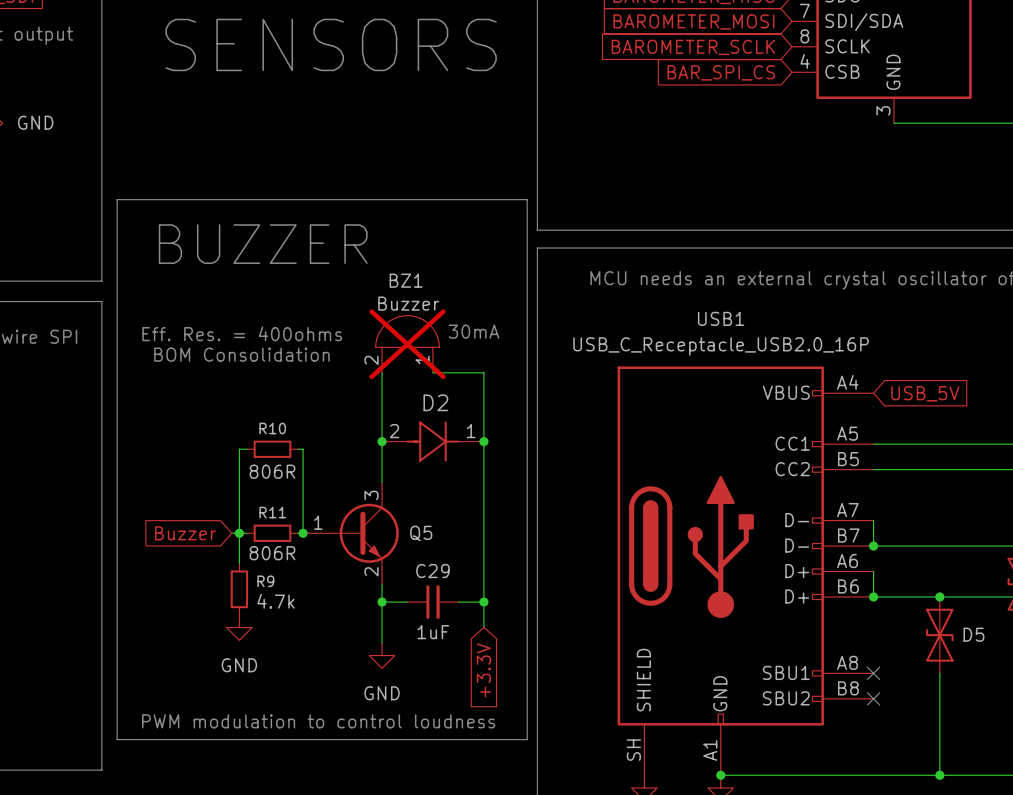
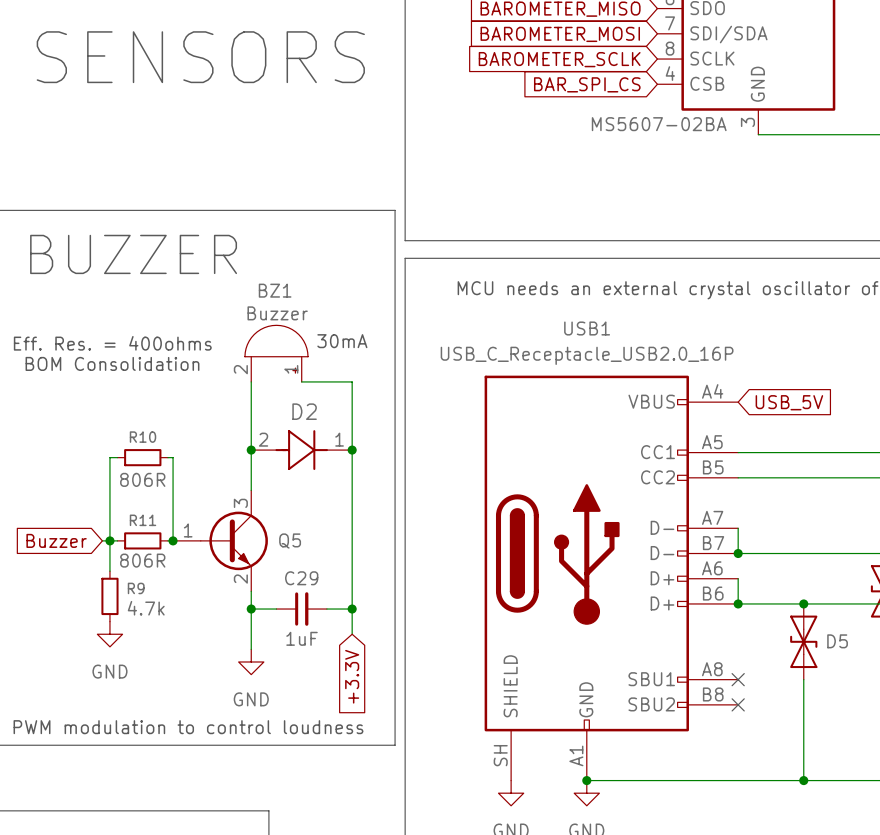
part value: none -> MS5607-02BA (659, 124)
BZ1 do-not-place cross: (407, 344) -> none

